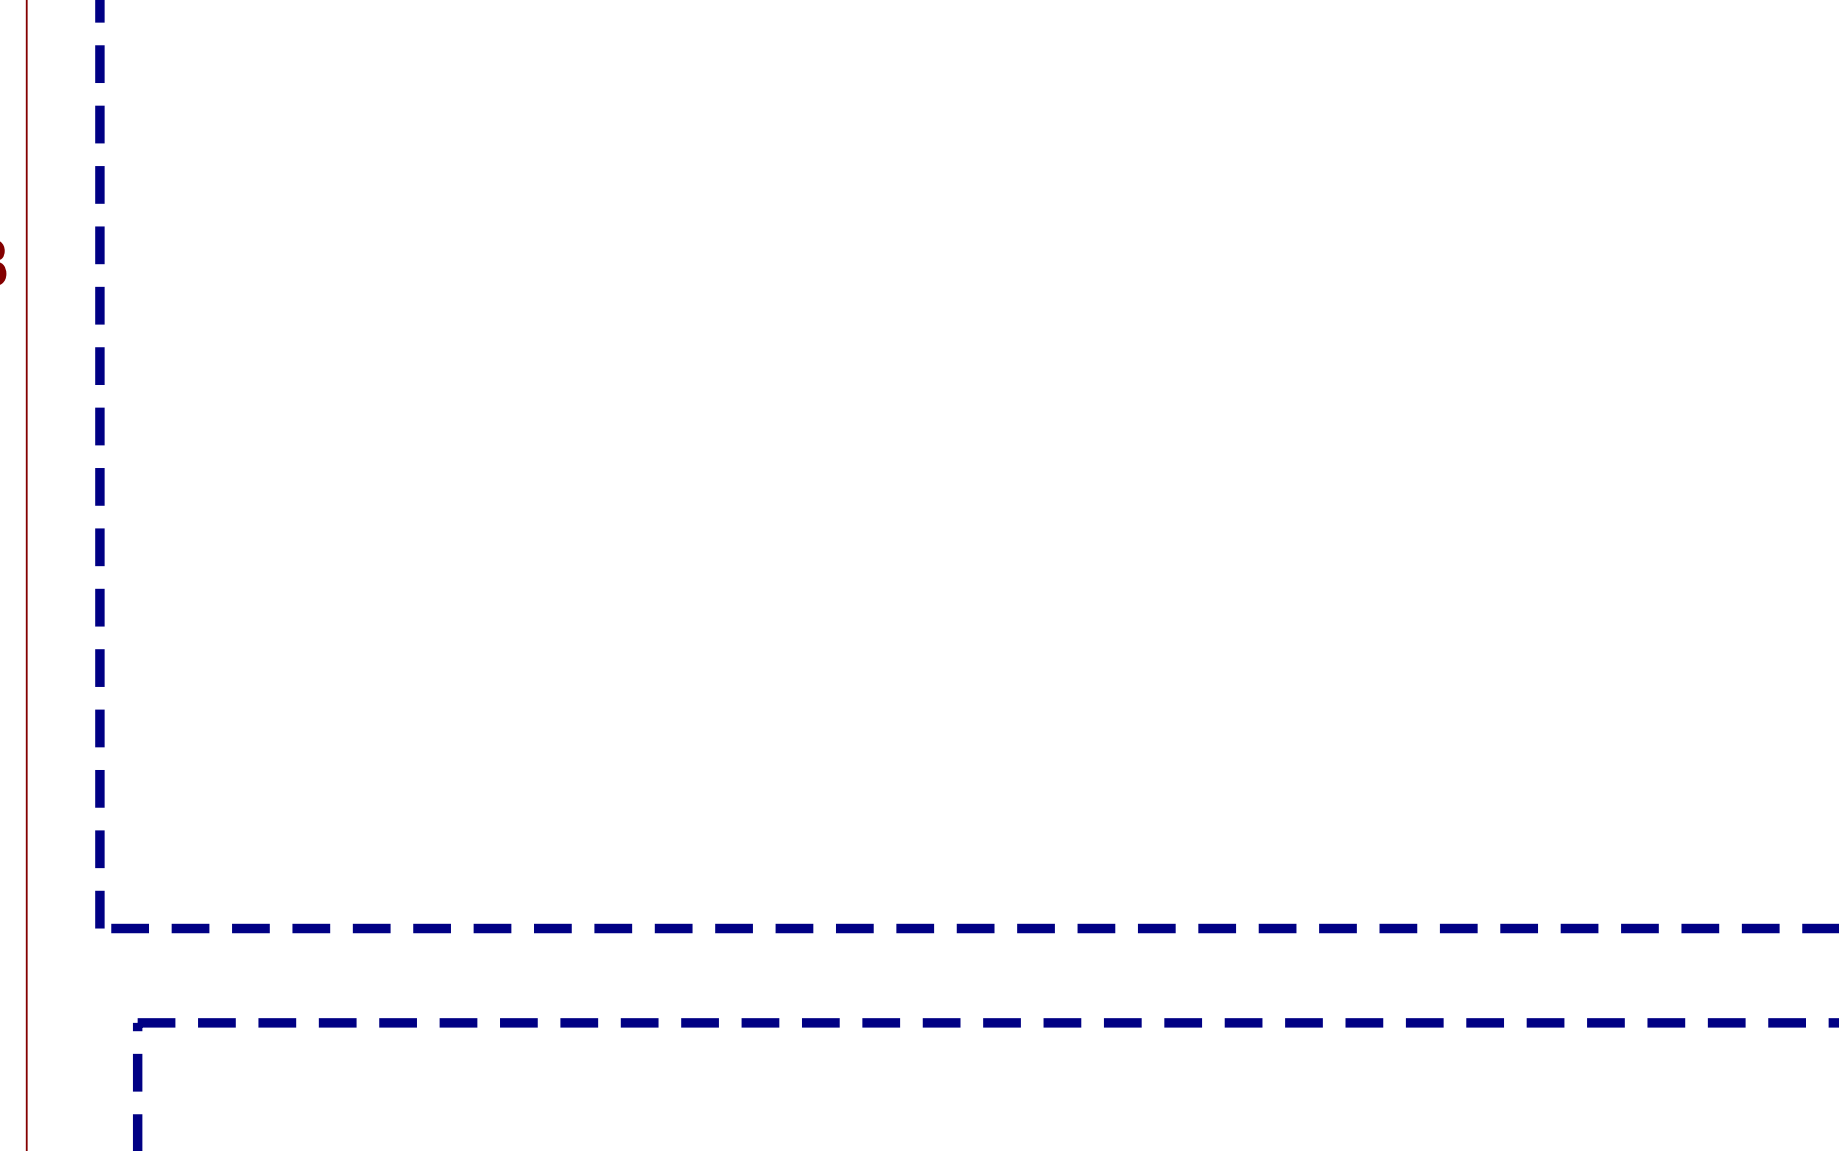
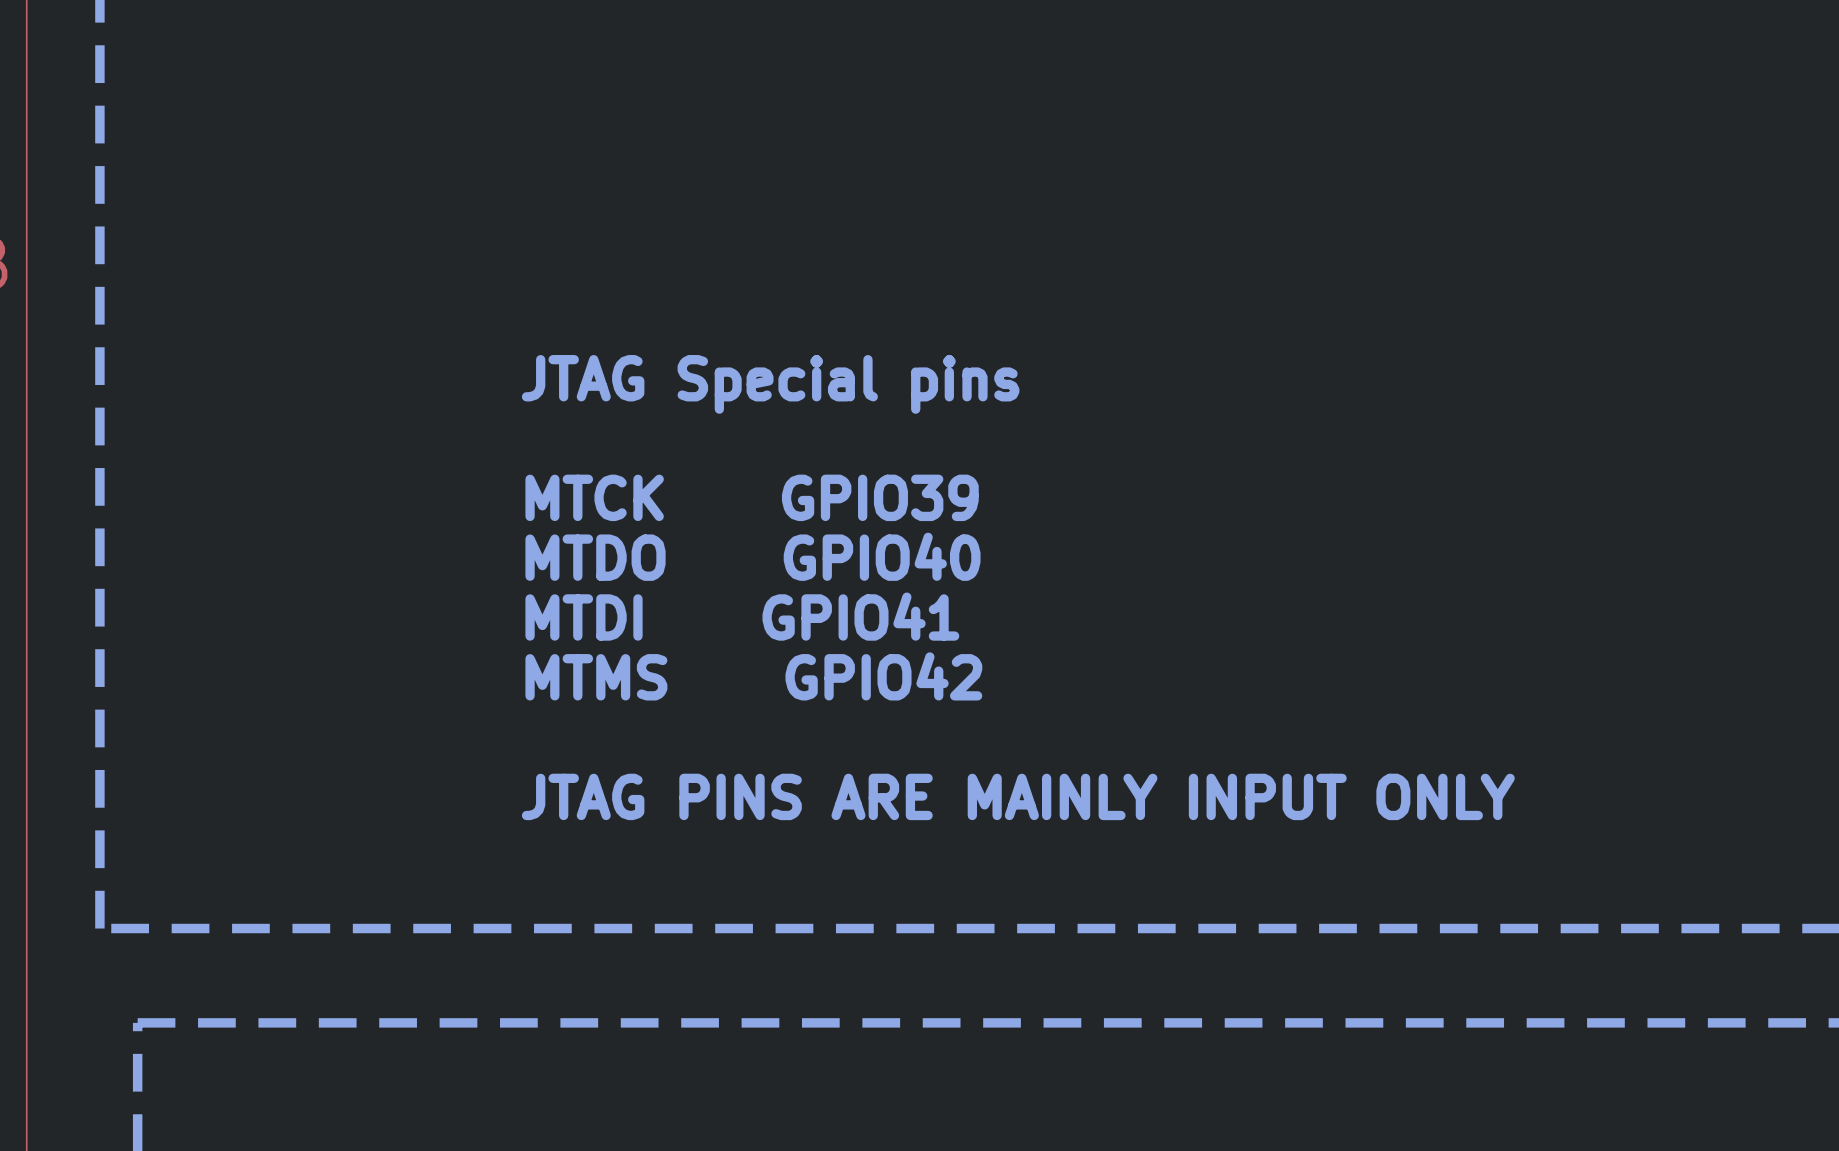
text: none -> JTAG Special pins (770, 384)
text: none -> MTCK GPIO39 (752, 497)
text: none -> MTDO GPIO40 (752, 556)
text: none -> MTDI GPIO41 (742, 616)
text: none -> MTMS GPIO42 (753, 676)
text: none -> JTAG PINS ARE MAINLY INPUT ONLY (1018, 796)

